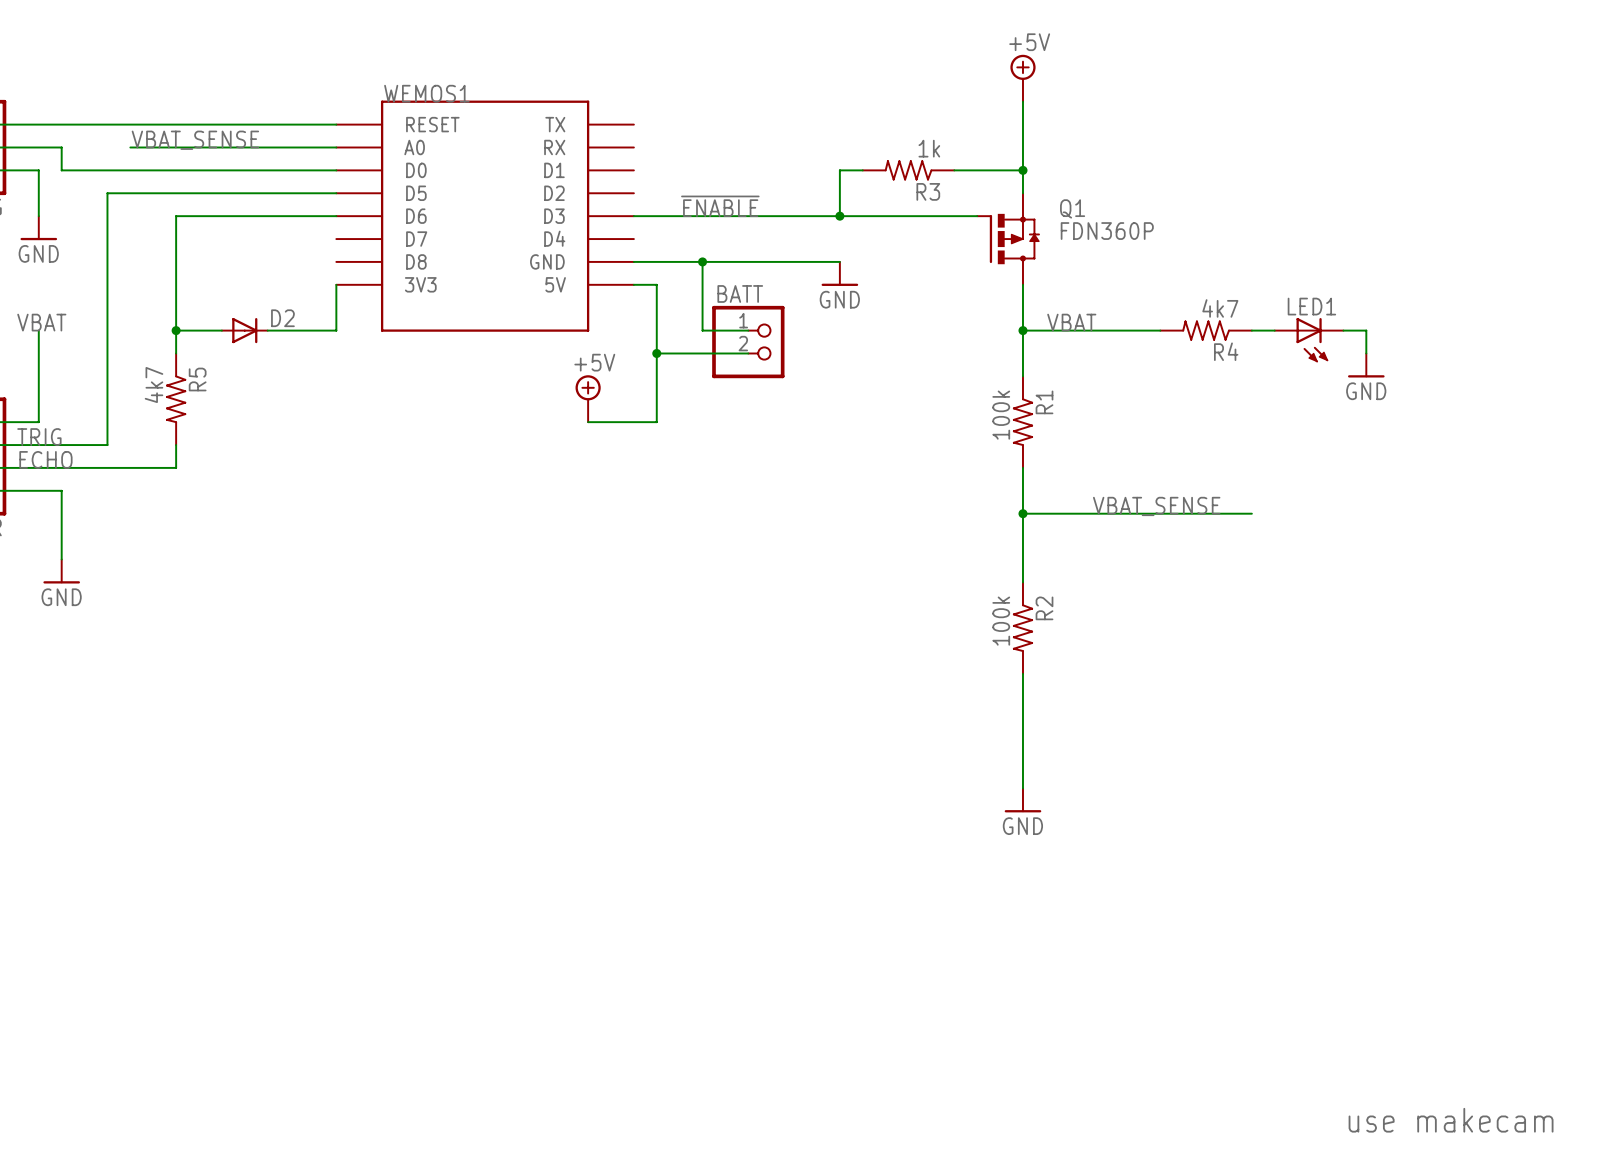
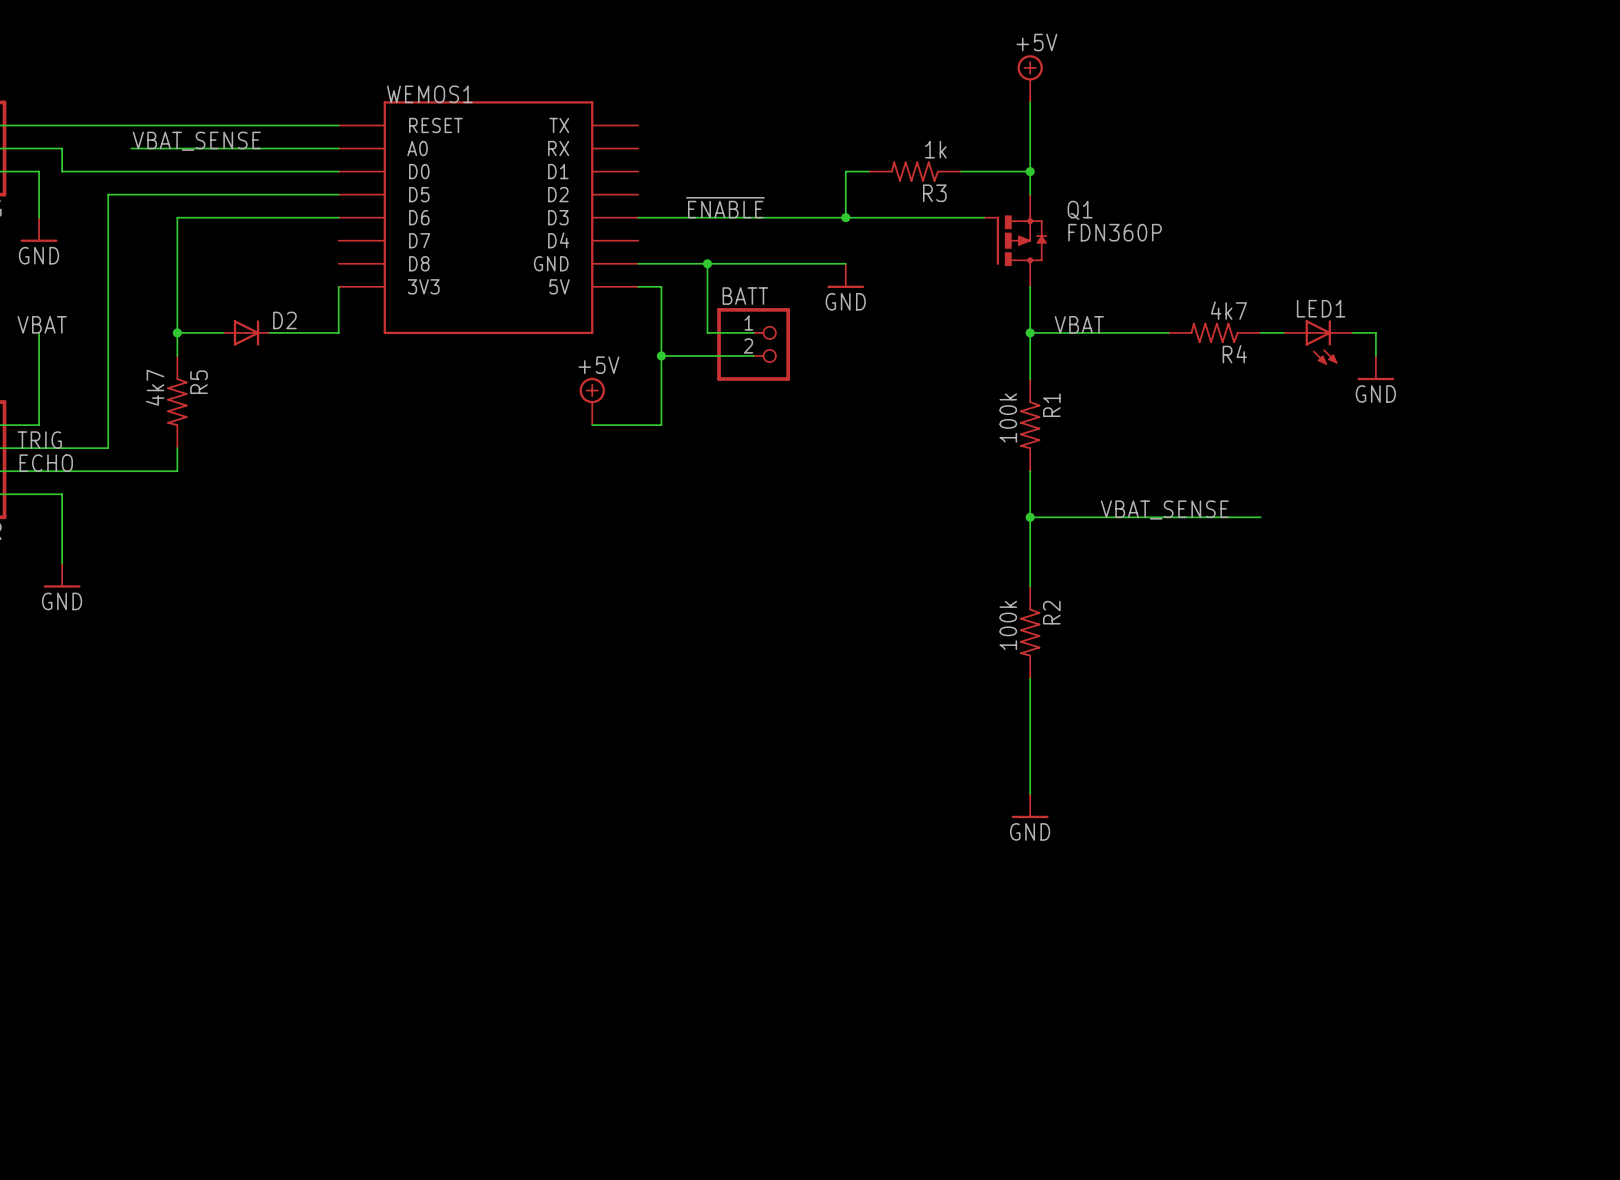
part: (1451, 1120) -> none

